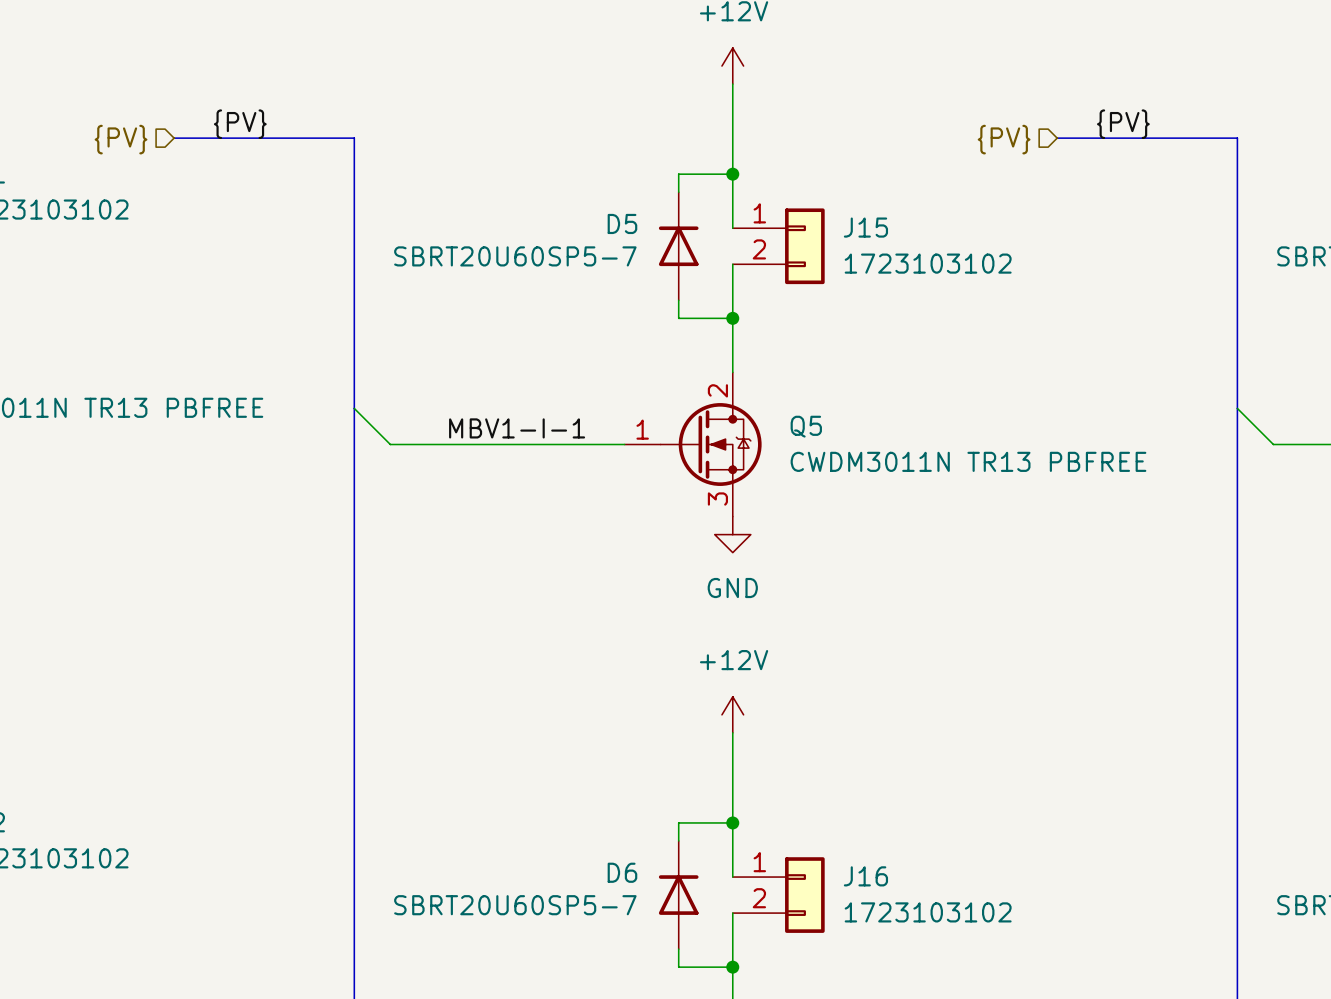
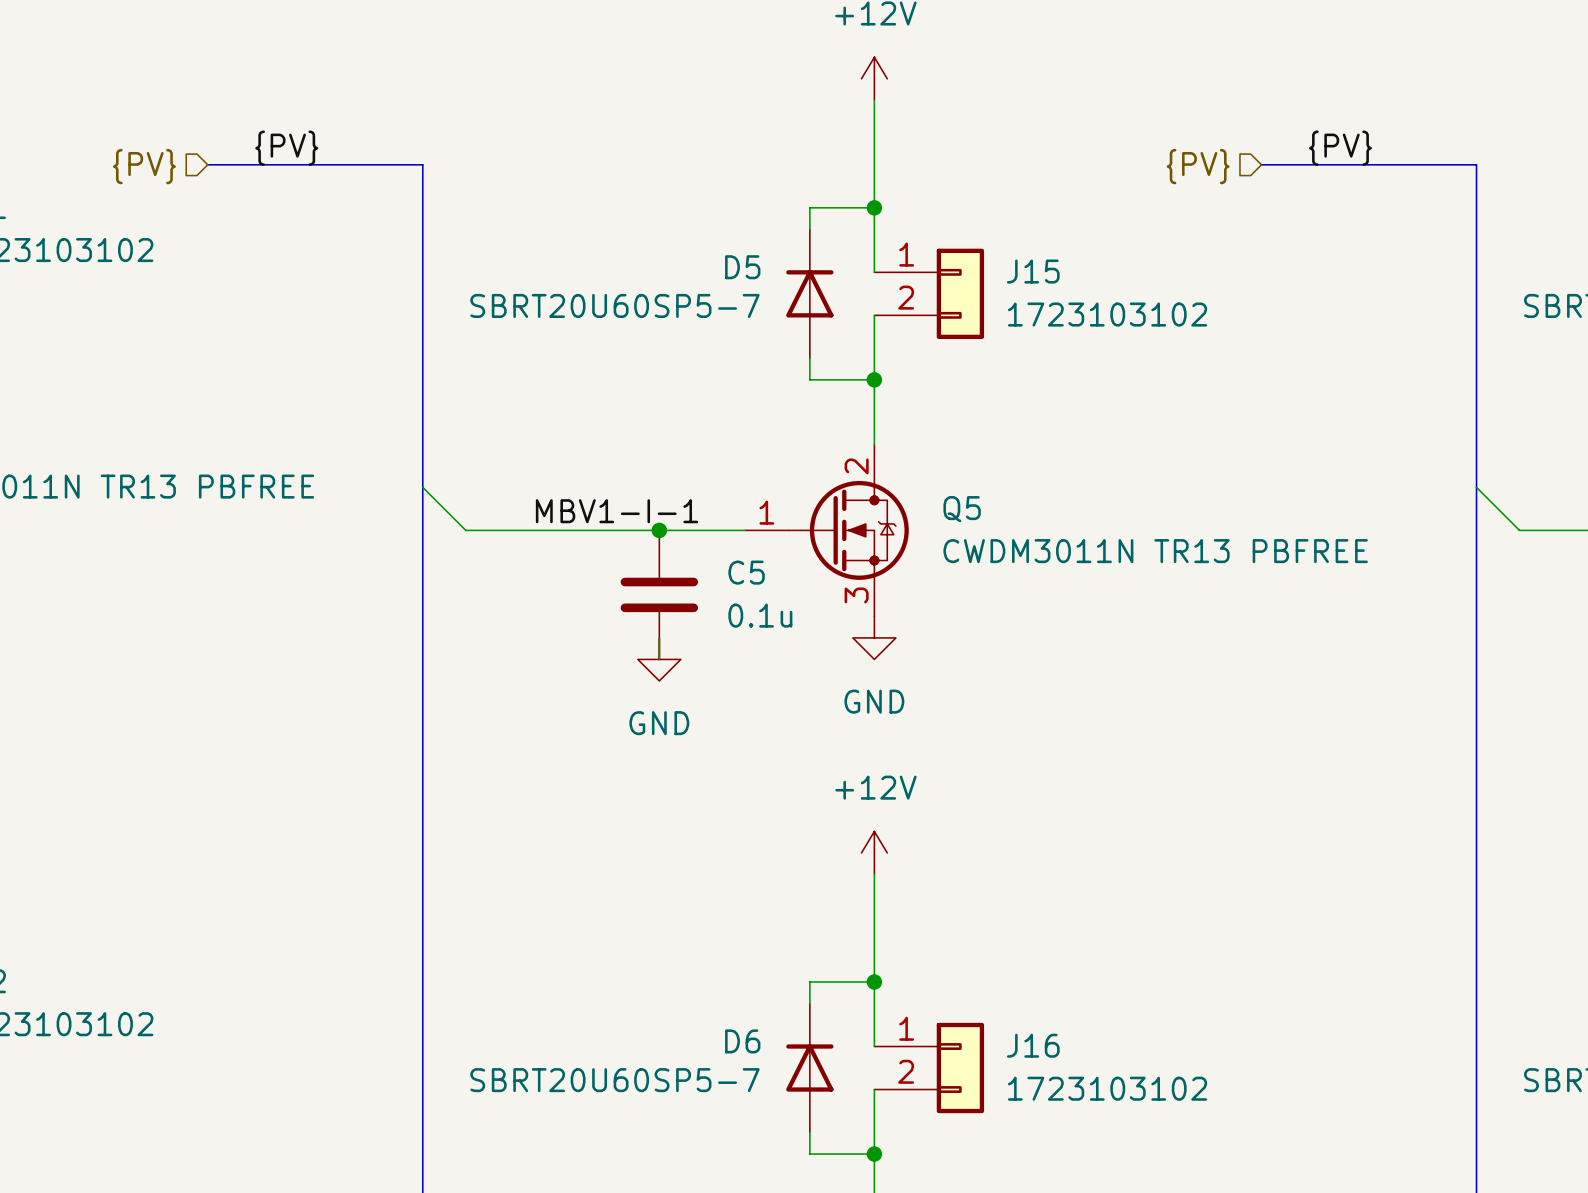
junction: none -> (659, 530)
C5: none -> 0.1u (659, 594)
wire: none -> (659, 637) (659, 659)
power symbol: none -> GND (659, 659)

